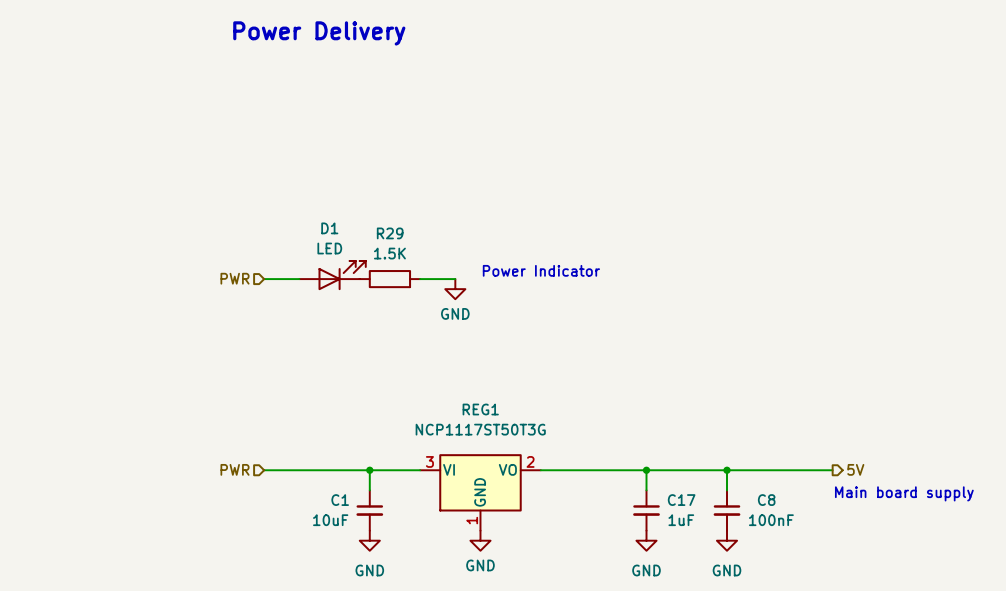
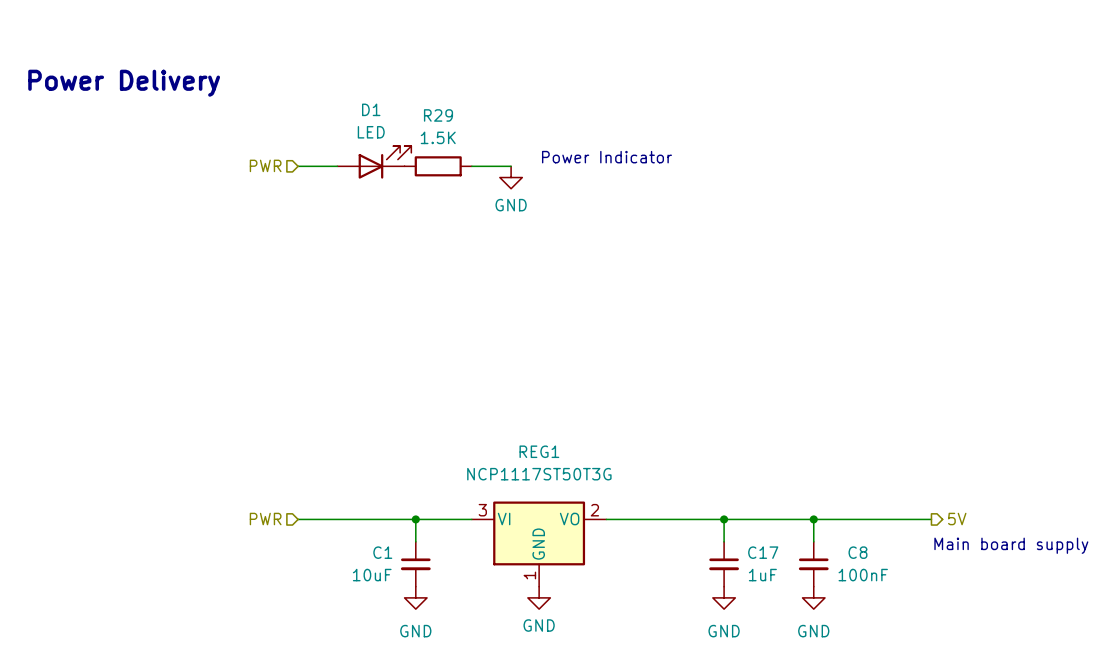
text: Power Delivery (319, 33) -> none
text: none -> Power Delivery (124, 83)
text position: Power Indicator (541, 270) -> Power Indicator (606, 157)
D1 position: (332, 275) -> (374, 162)
hierarchical label position: PWR (235, 278) -> PWR (265, 165)
wire: (264, 279) (299, 279) -> (298, 166) (337, 166)
R29 position: (389, 279) -> (438, 166)
wire: (420, 279) (455, 279) -> (471, 166) (511, 166)
power symbol position: GND (455, 289) -> GND (511, 177)

